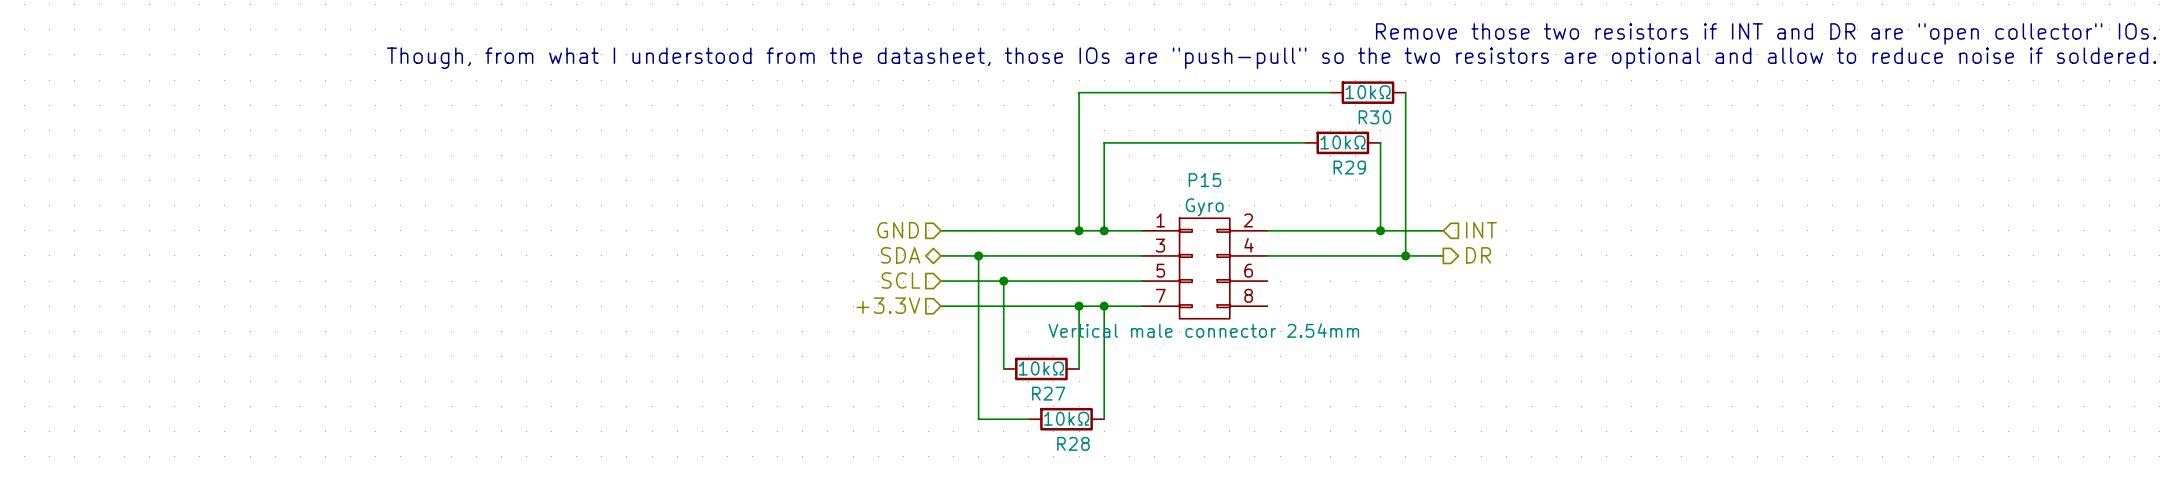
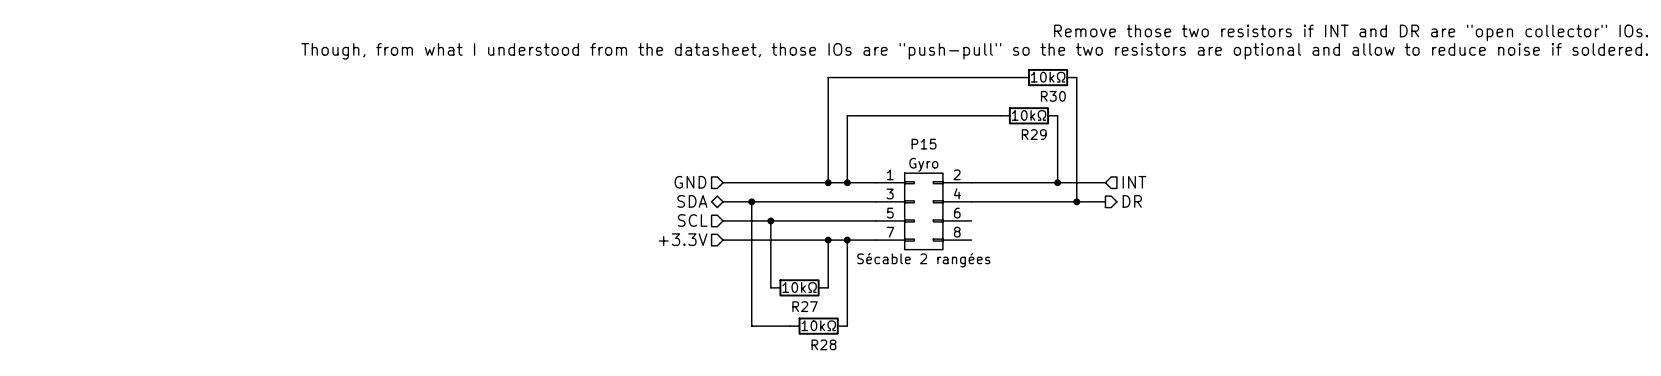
P15 text: Vertical male connector 2.54mm (1203, 330) -> Sécable 2 rangées (923, 260)

